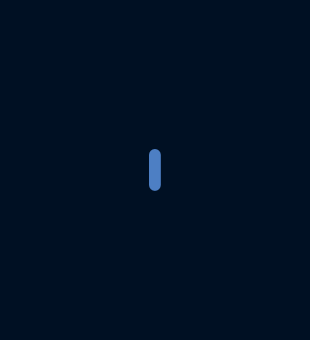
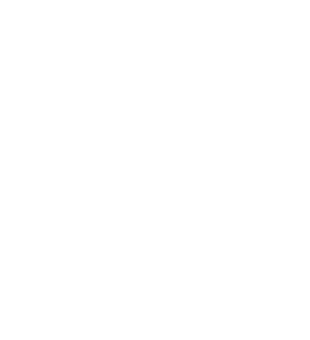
bottom track: (154, 154) (154, 184) -> none

